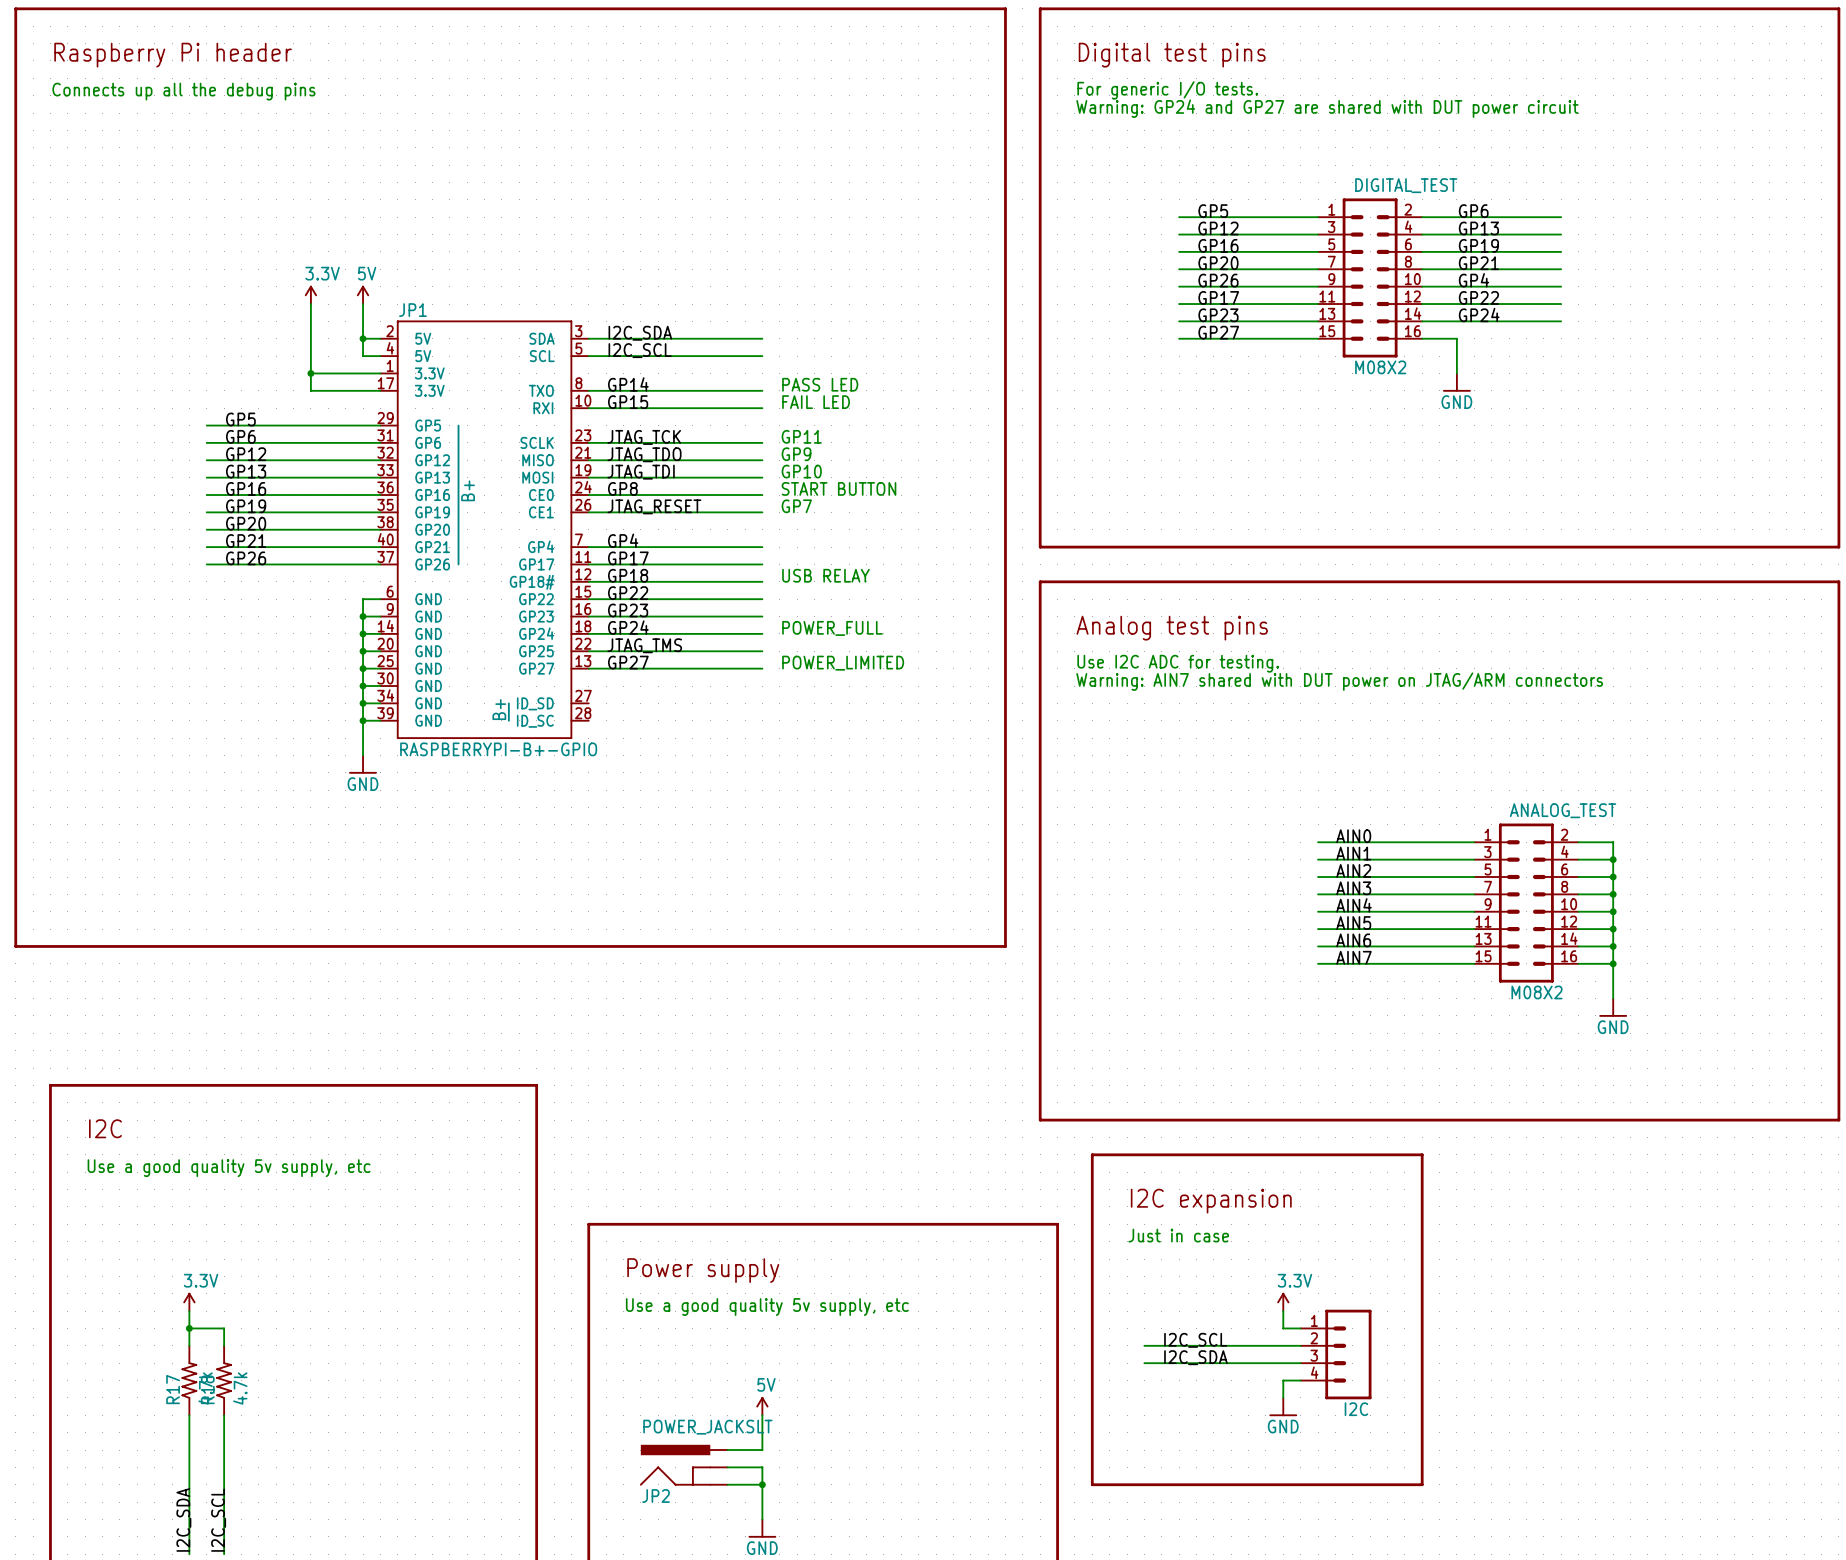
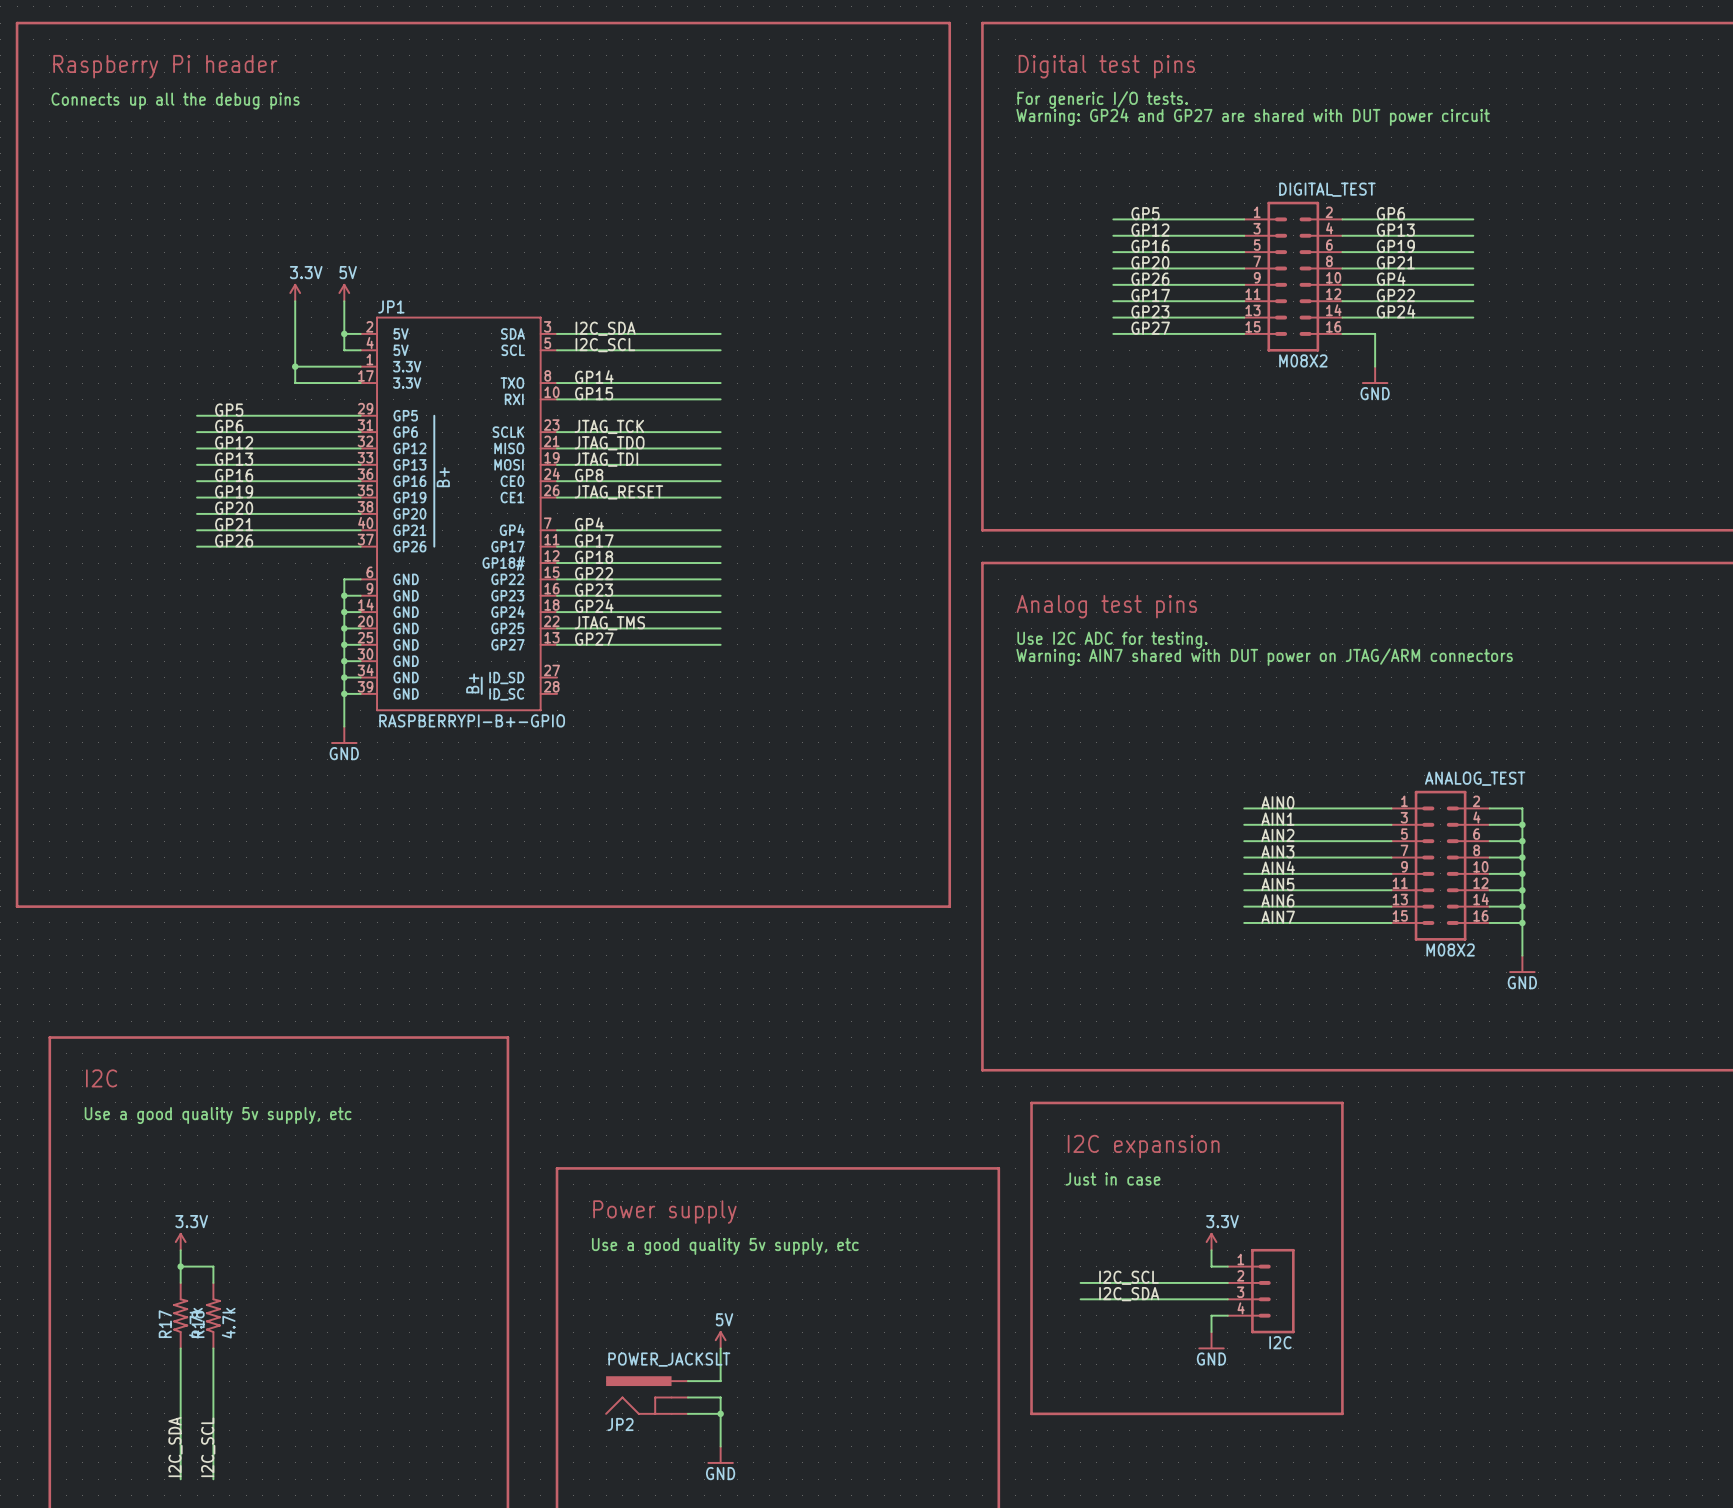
text: PASS LED (820, 384) -> none
text: FAIL LED (816, 402) -> none
text: GP11 (801, 436) -> none
text: GP9 (796, 454) -> none
text: GP10 (801, 471) -> none
text: START BUTTON (838, 488) -> none
text: GP7 (796, 506) -> none
text: USB RELAY (825, 575) -> none
text: POWER_FULL (832, 628) -> none
text: POWER_LIMITED (843, 663) -> none

